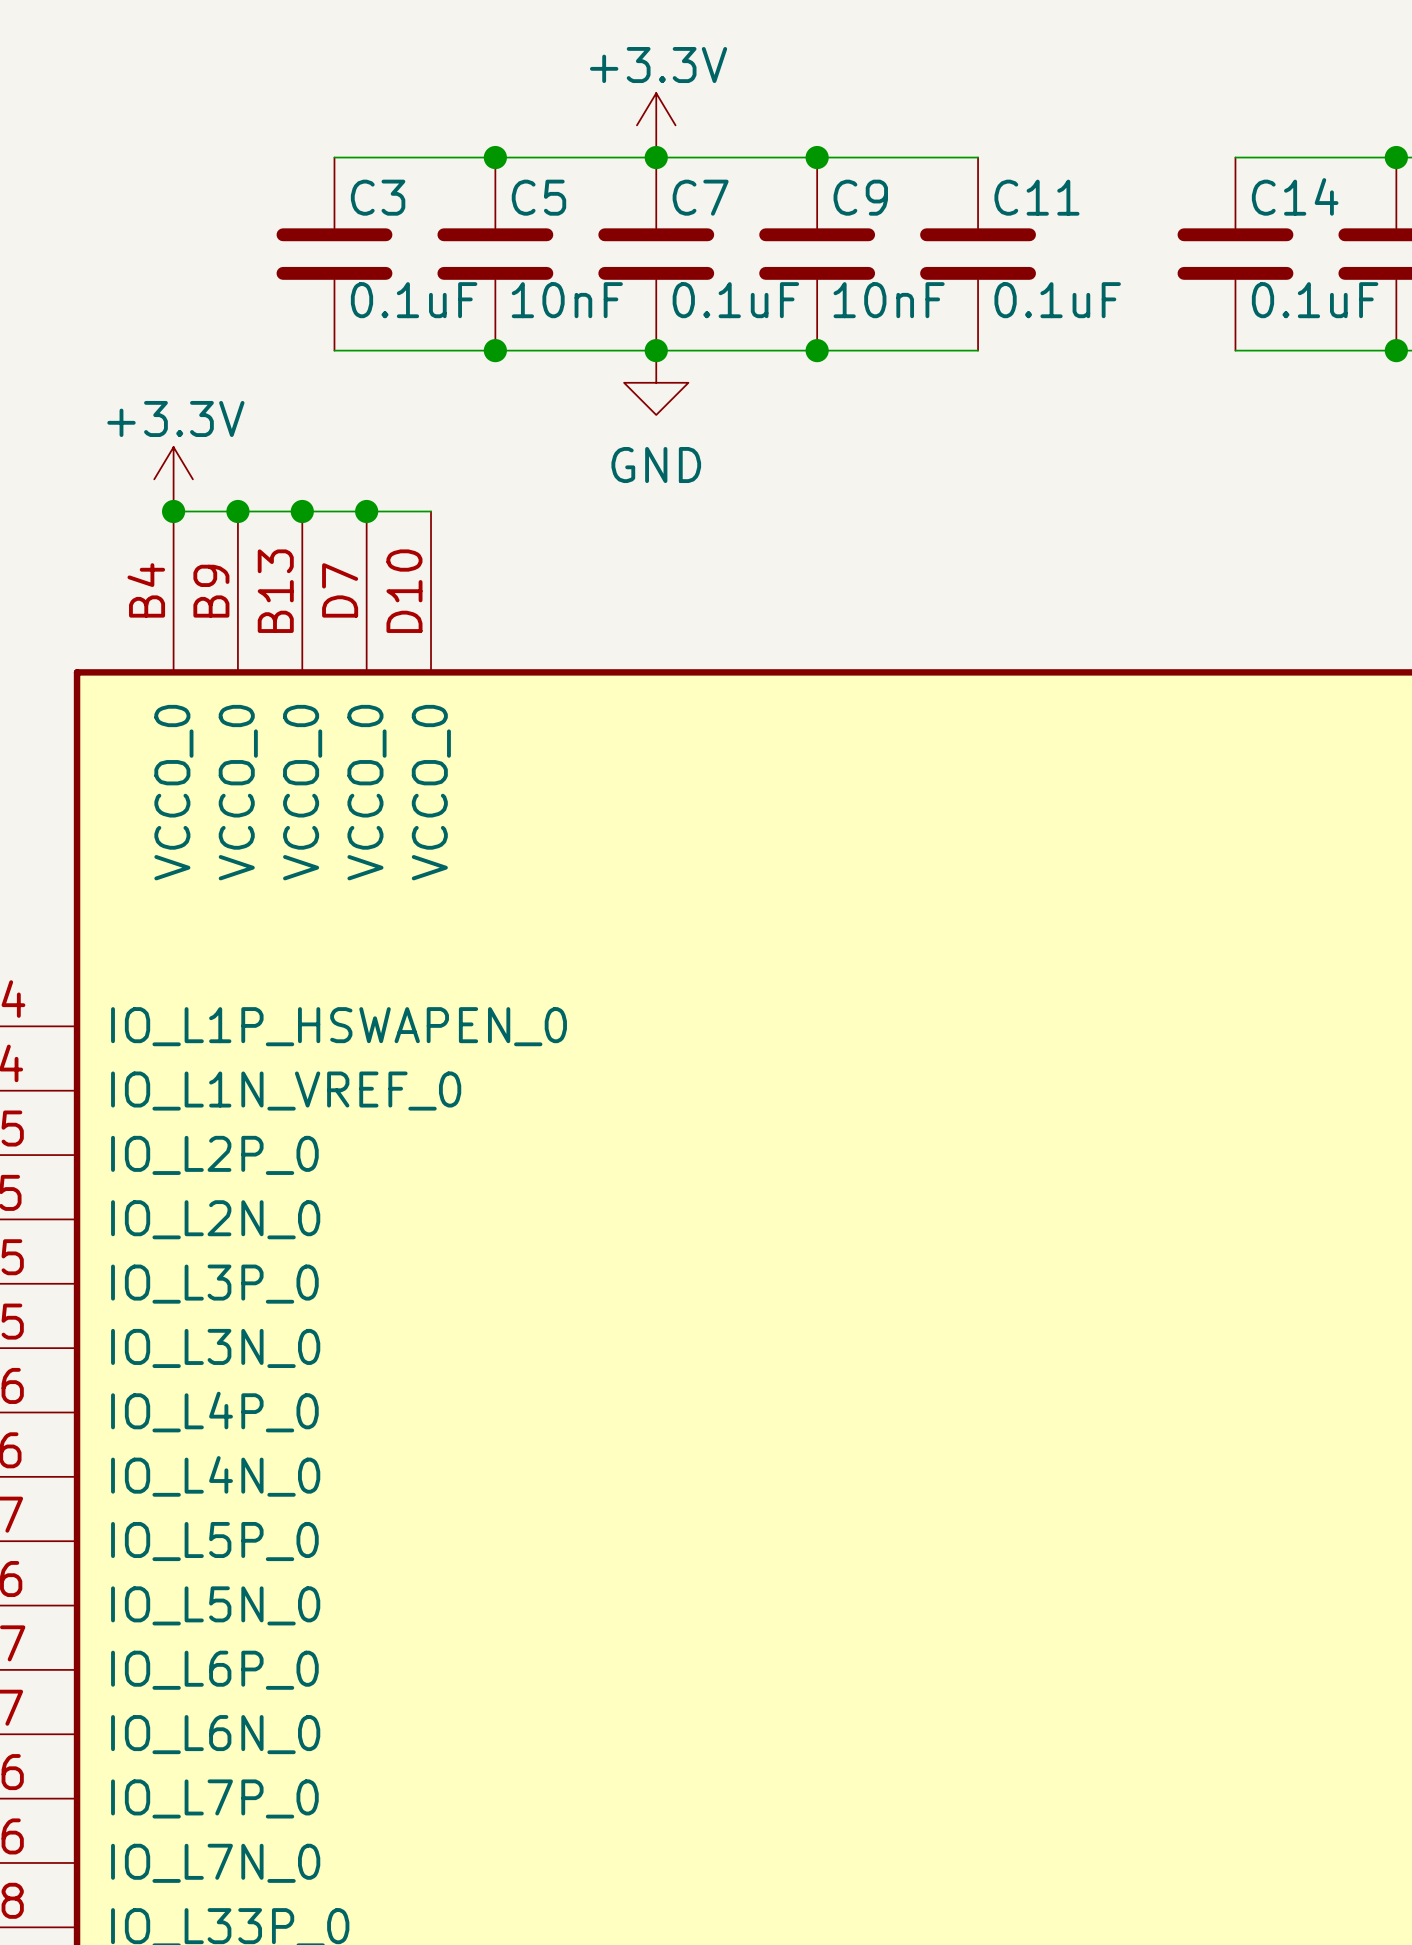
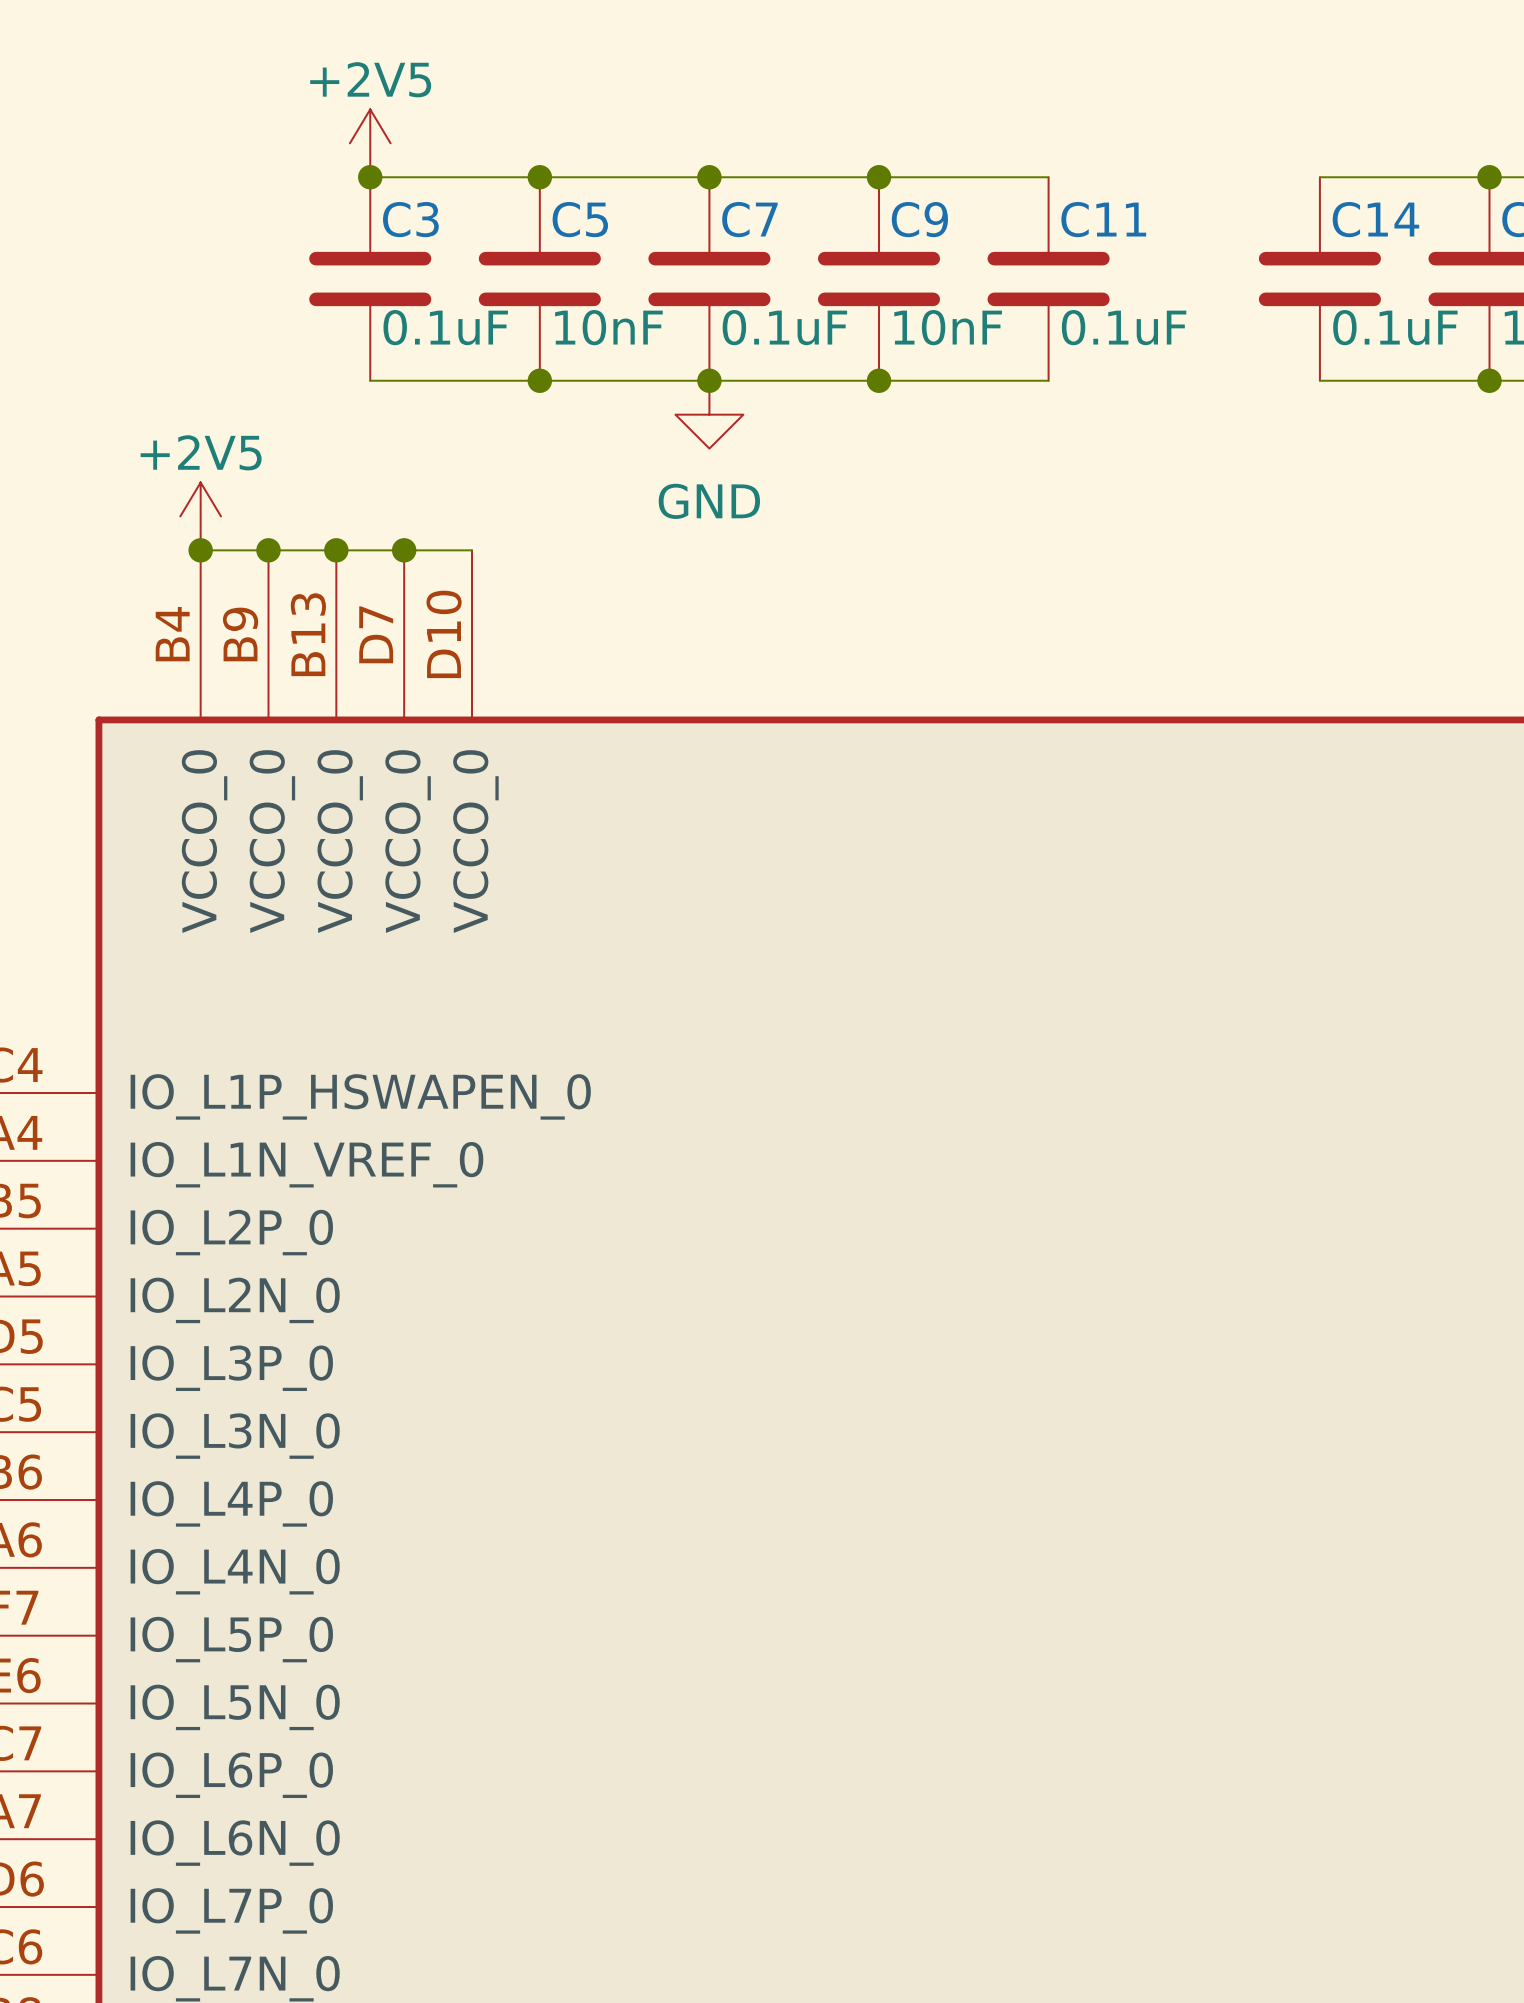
power symbol: none -> +2V5 (370, 143)
power symbol: +3.3V (656, 125) -> none
junction: none -> (370, 177)
power symbol: +3.3V (173, 479) -> +2V5 (200, 516)

